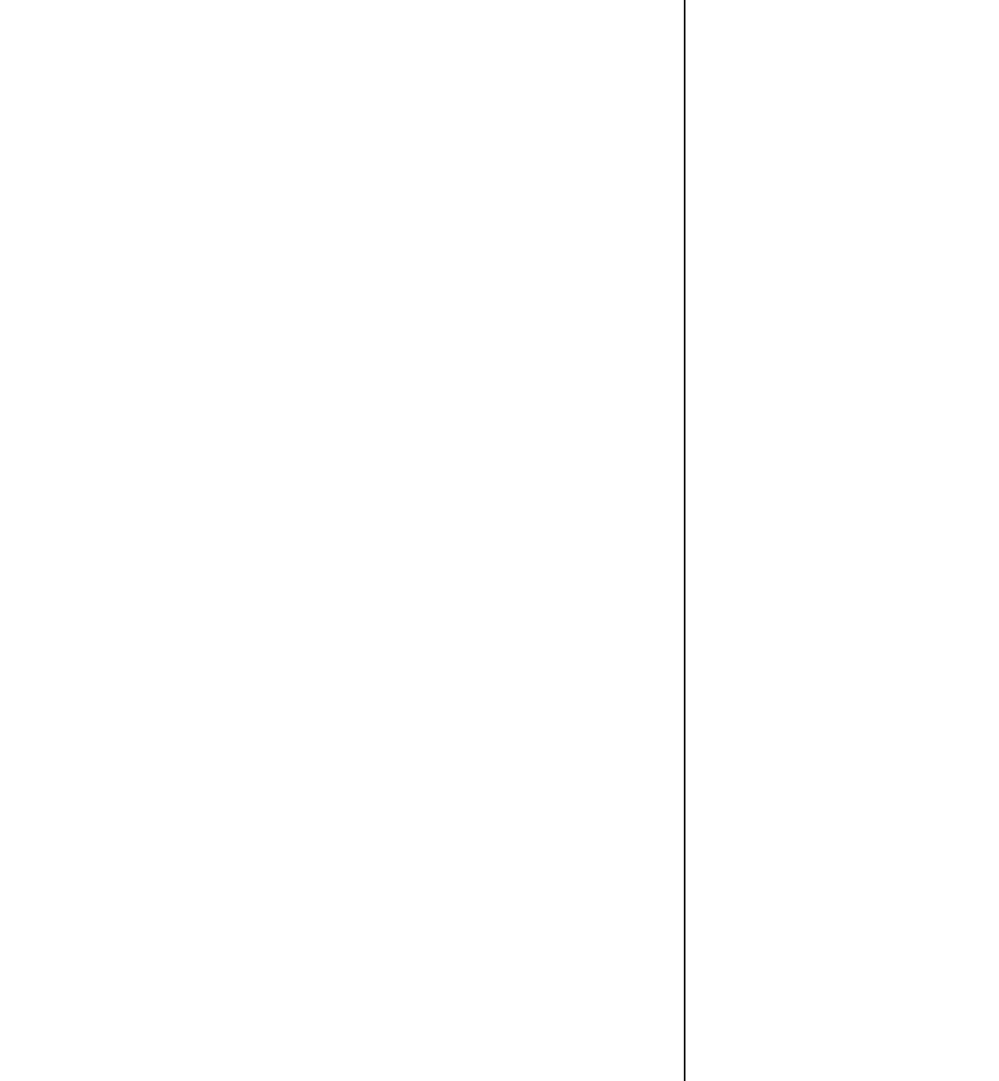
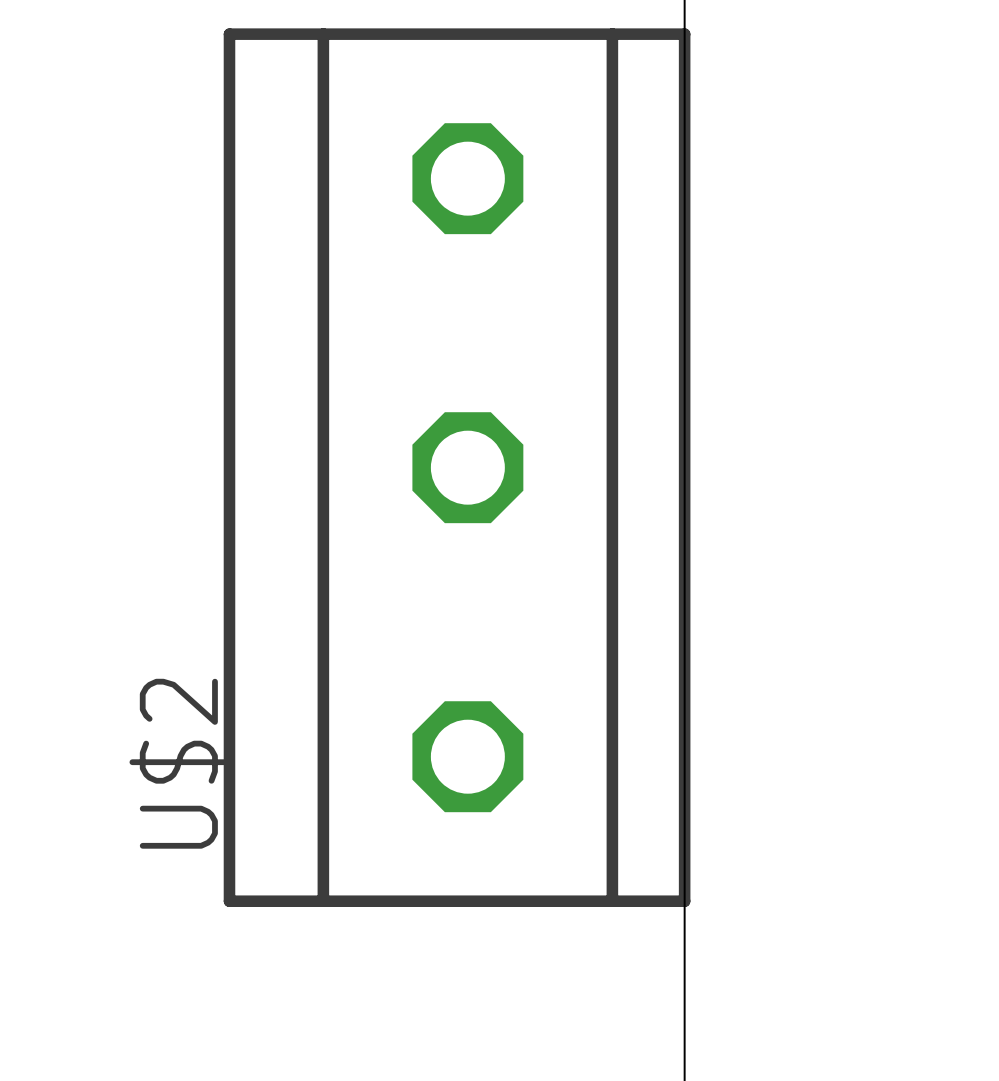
U$2: none -> (457, 467)

